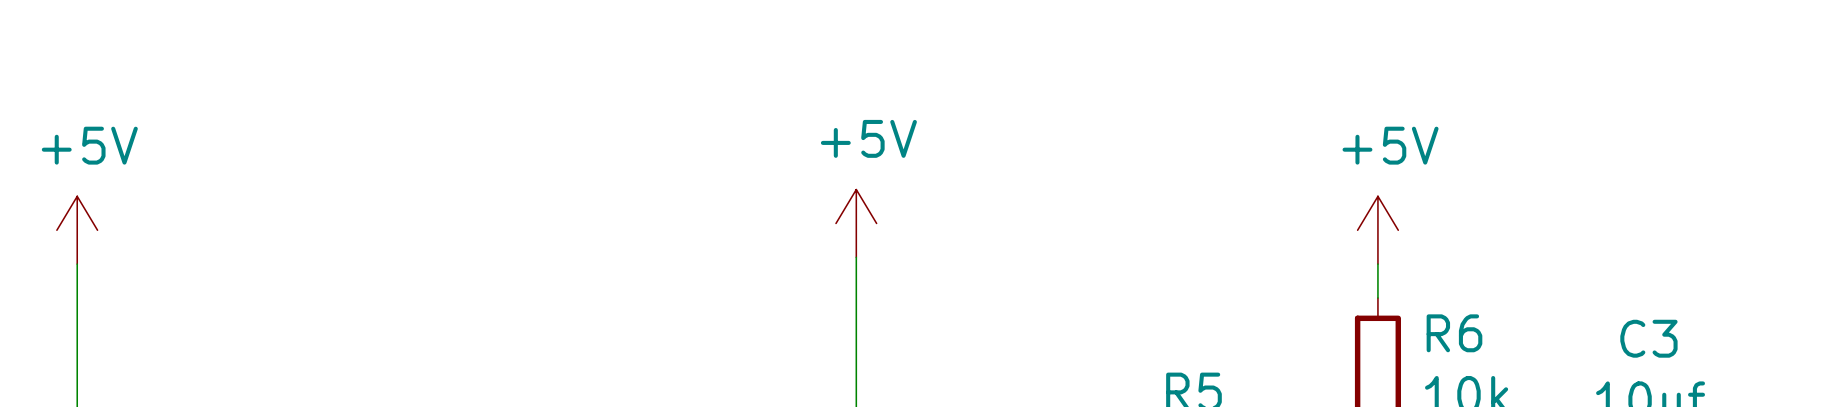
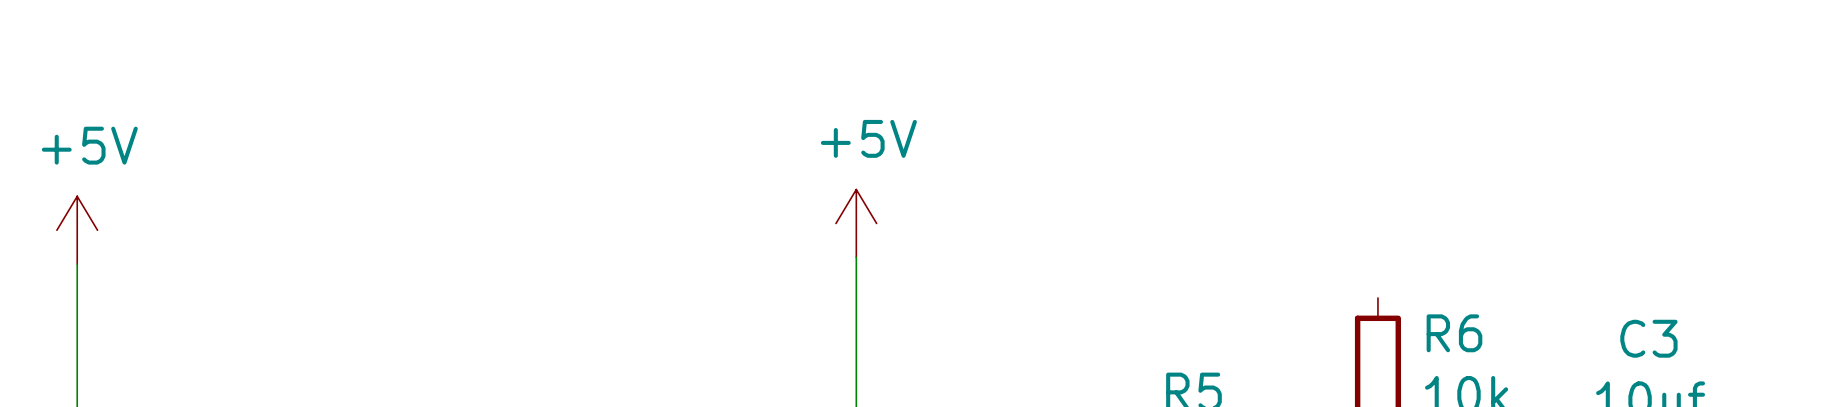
power symbol: +5V (1377, 230) -> none
wire: (1377, 264) (1377, 297) -> none

